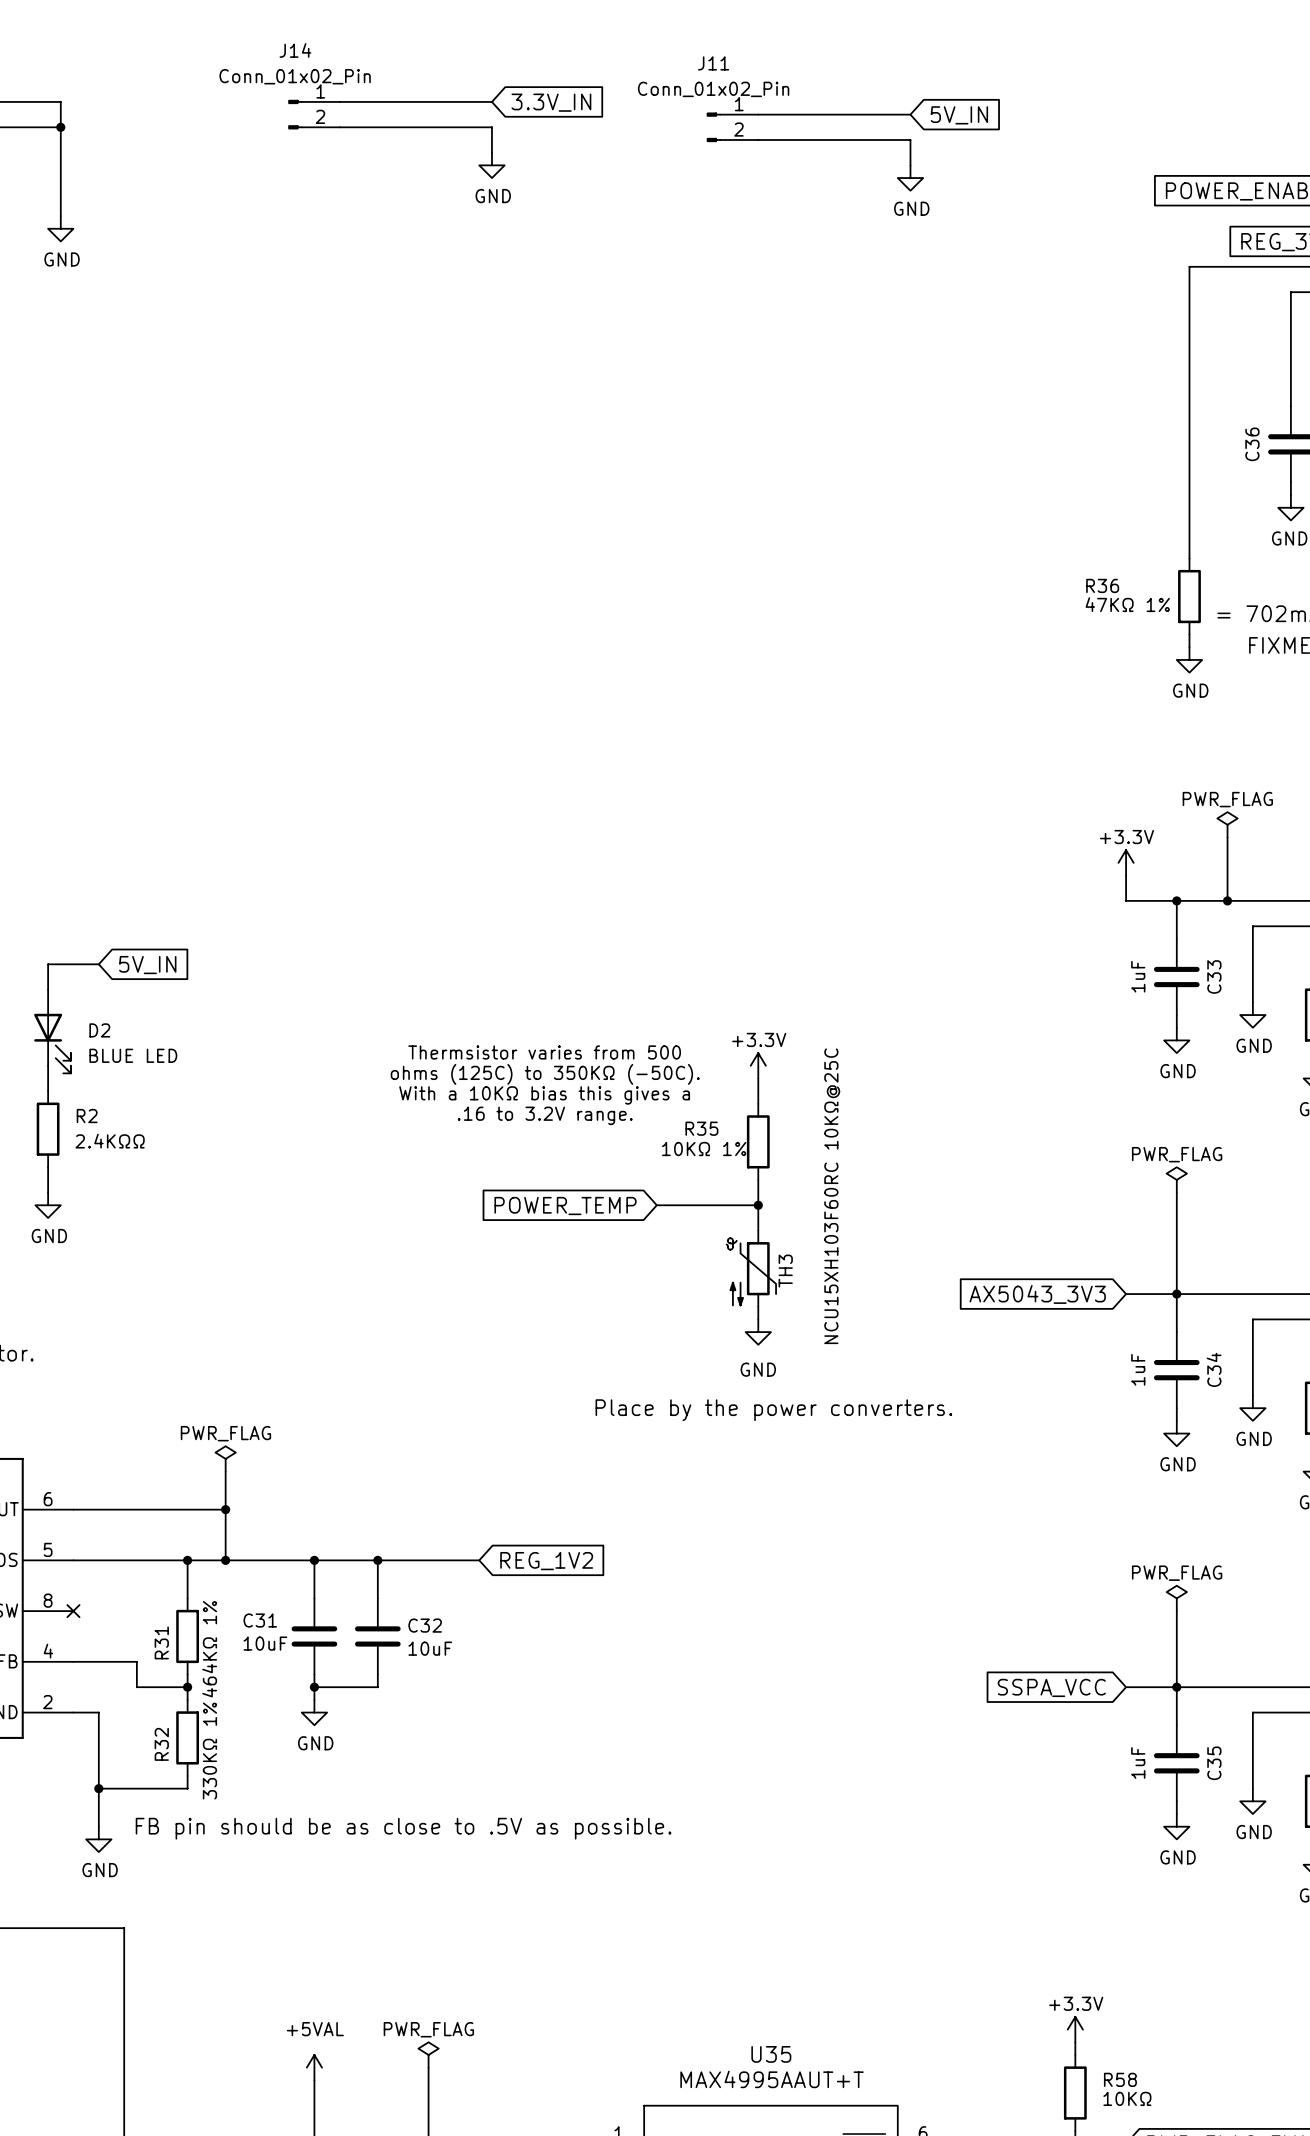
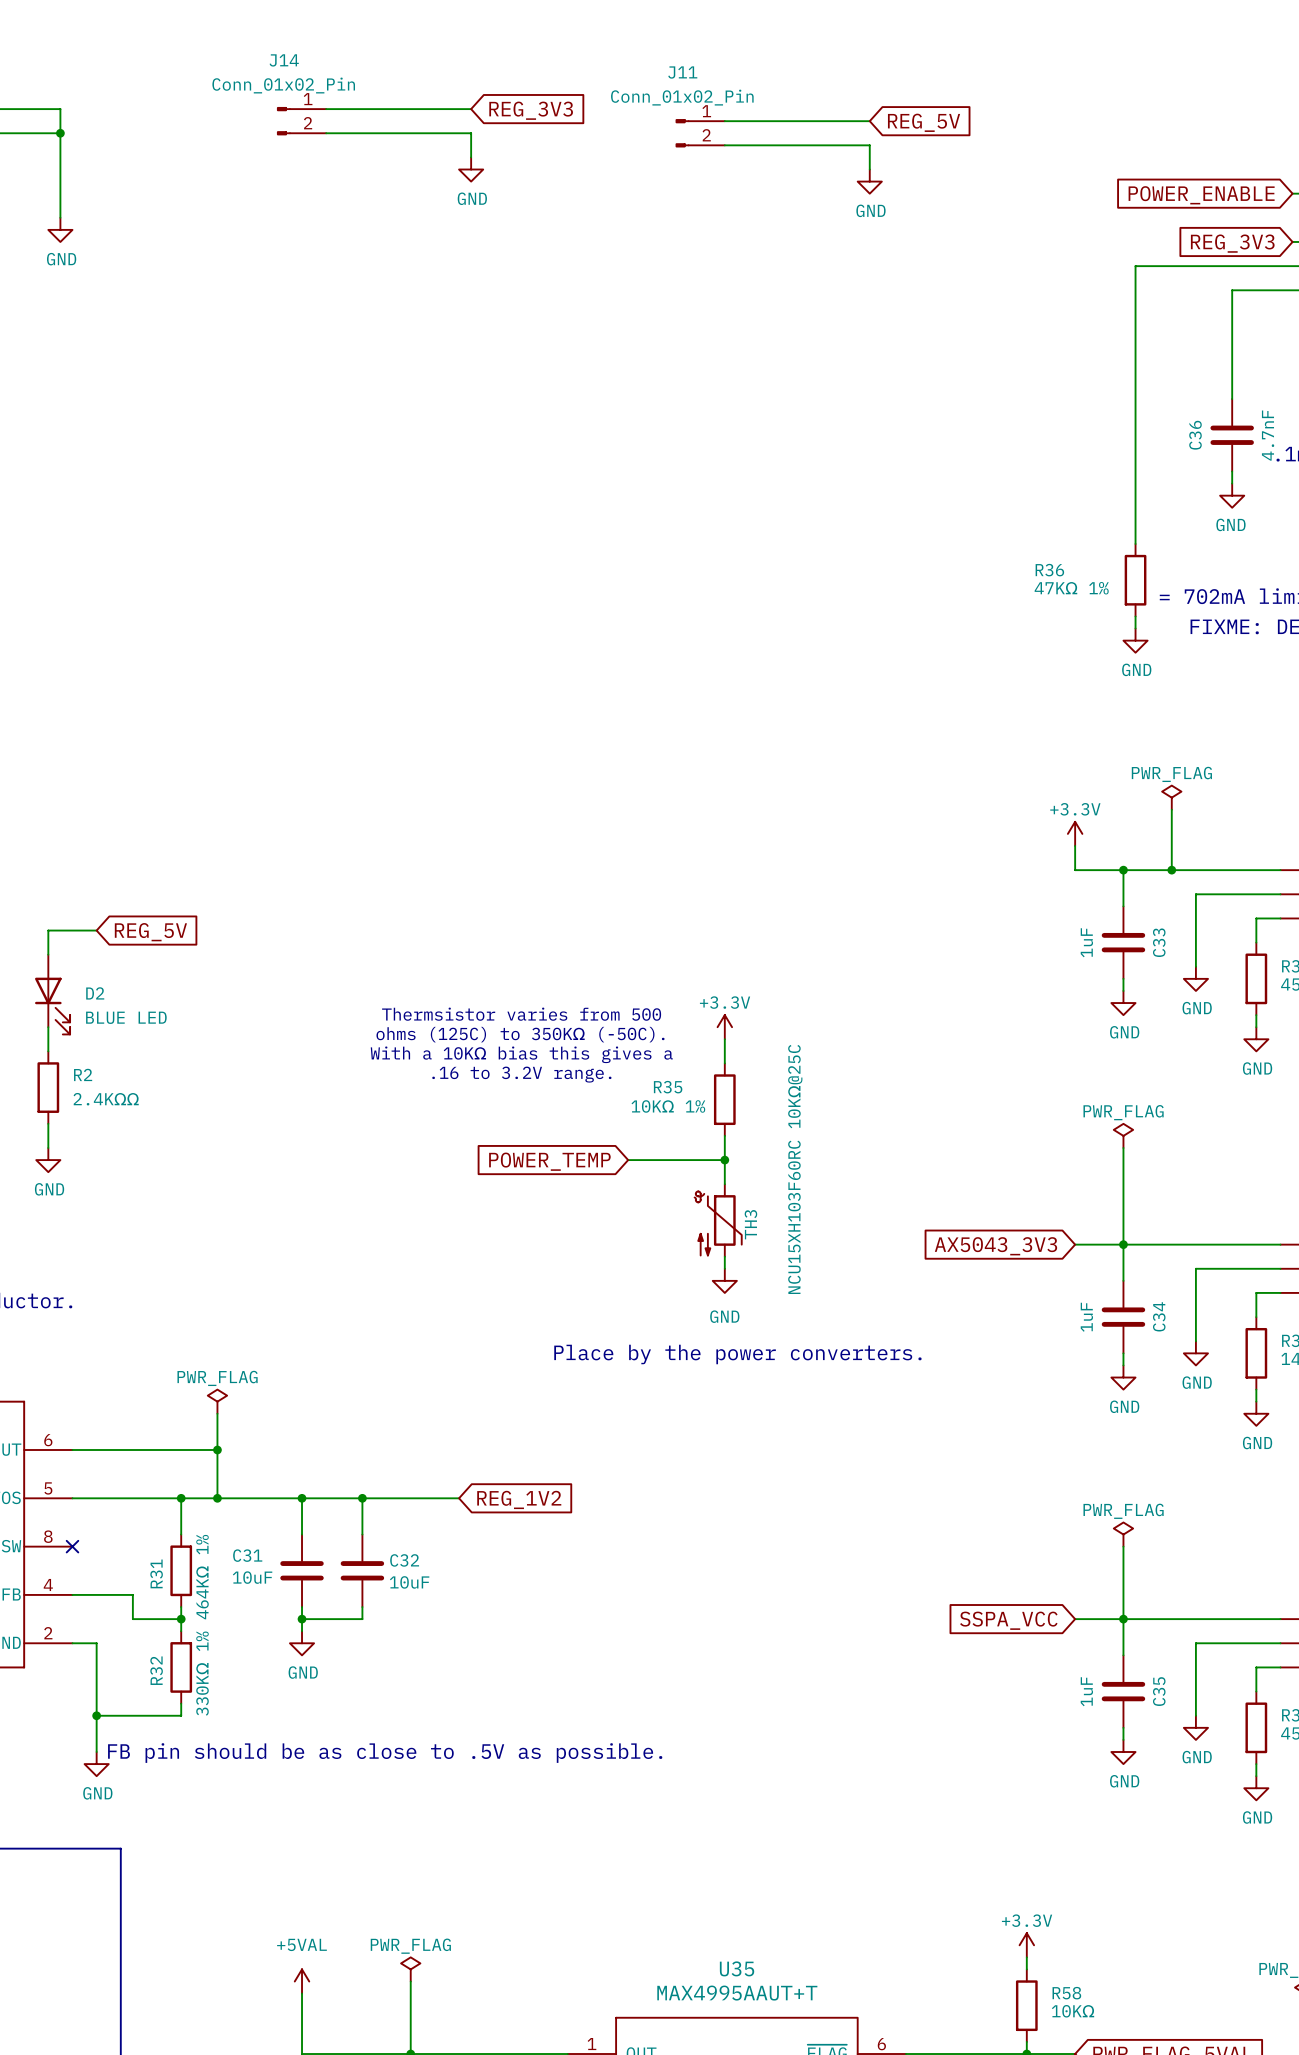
global label: 3.3V_IN (551, 102) -> REG_3V3 (531, 110)
global label: 5V_IN (959, 115) -> REG_5V (924, 122)
global label: 5V_IN (147, 965) -> REG_5V (150, 932)

